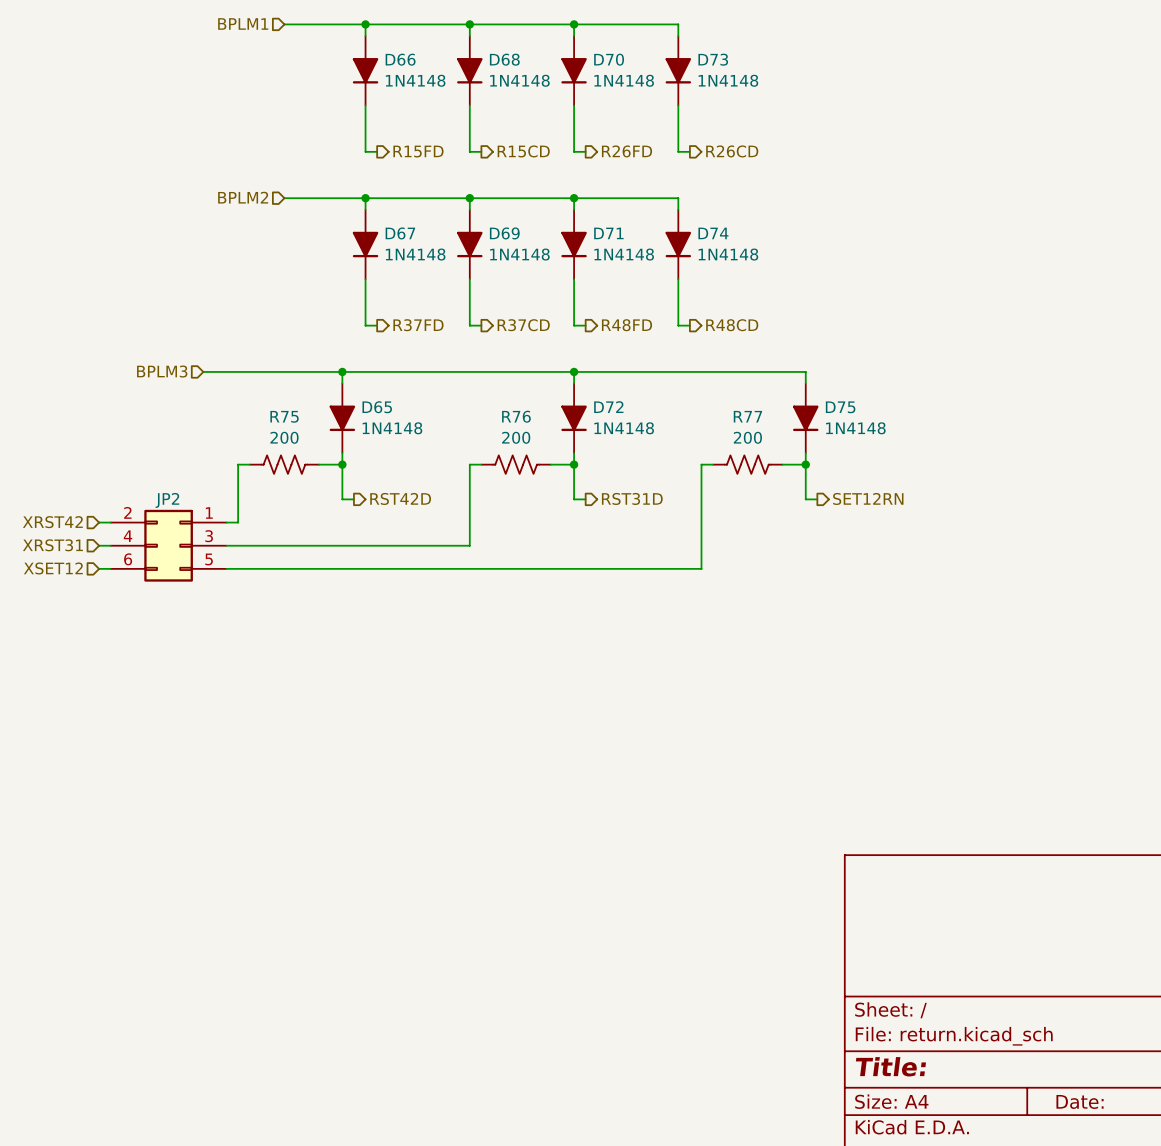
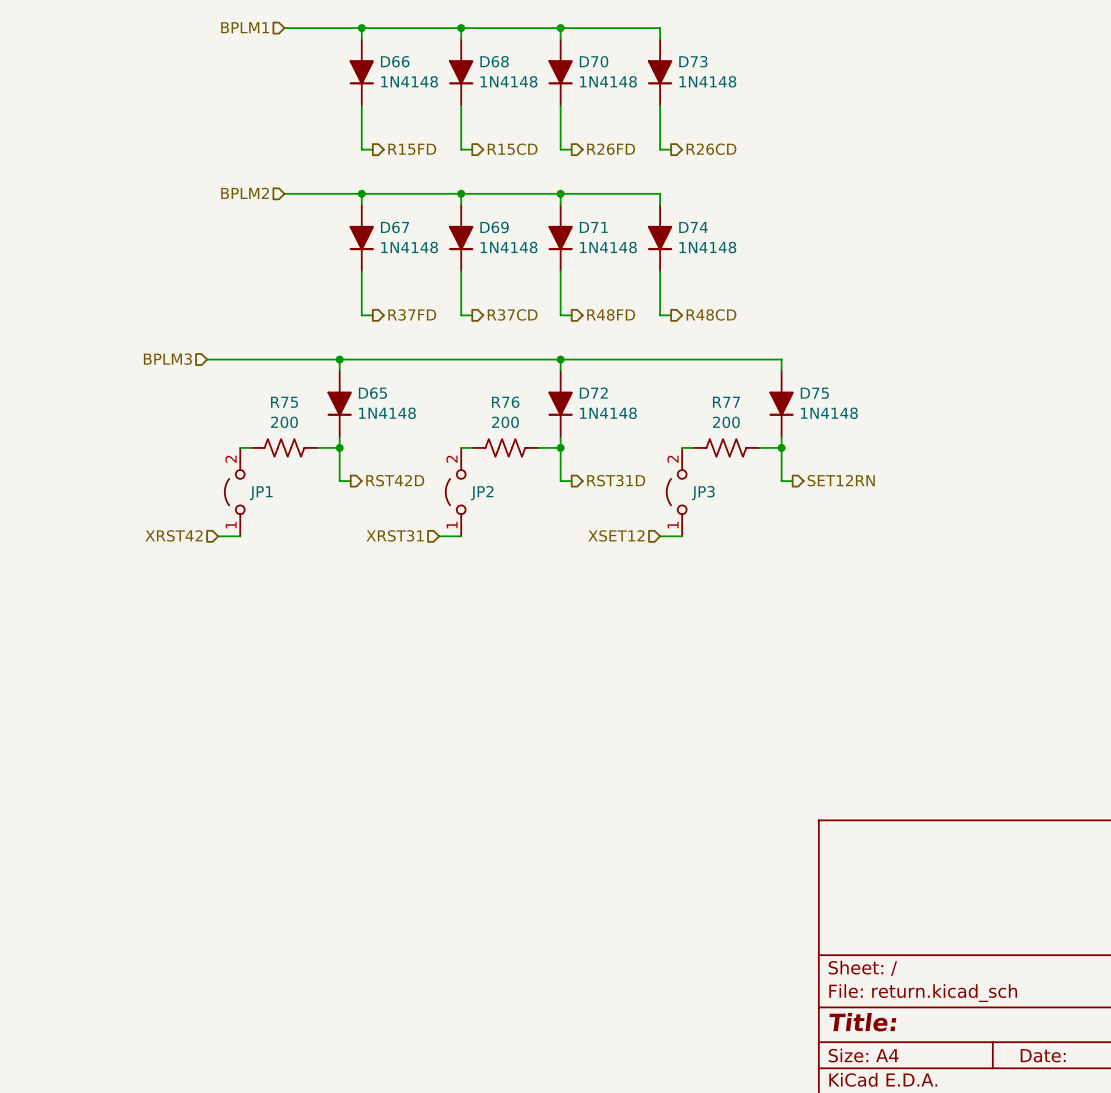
wire: (238, 464) (238, 522) (226, 522) -> none
wire: (469, 464) (469, 545) (226, 545) -> none
wire: (701, 464) (701, 568) (226, 568) -> none
JP2 name position: JP2 (167, 500) -> JP2 (482, 493)
JP2 symbol: [110, 509, 227, 582] -> [445, 447, 466, 537]
JP1: none -> (234, 492)
JP3: none -> (676, 492)
hierarchical label position: XRST42 (52, 522) -> XRST42 (174, 535)
wire: (99, 522) (110, 522) -> none
hierarchical label: XRST31 (52, 545) -> none
wire: (99, 545) (110, 545) -> none
hierarchical label: none -> XRST31 (395, 535)
hierarchical label: none -> XSET12 (616, 535)
wire: none -> (218, 536) (240, 536)
wire: none -> (439, 536) (461, 536)
wire: none -> (660, 536) (682, 536)
hierarchical label: XSET12 (53, 568) -> none
wire: (99, 568) (110, 568) -> none

